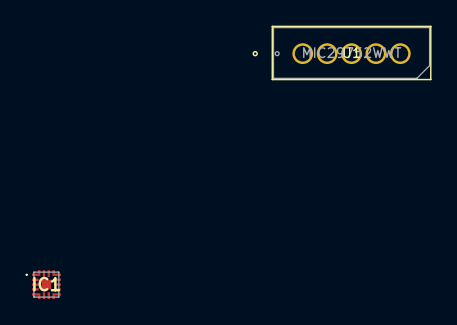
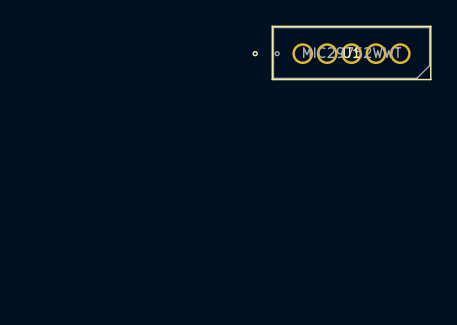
IC1: (43, 284) -> none

